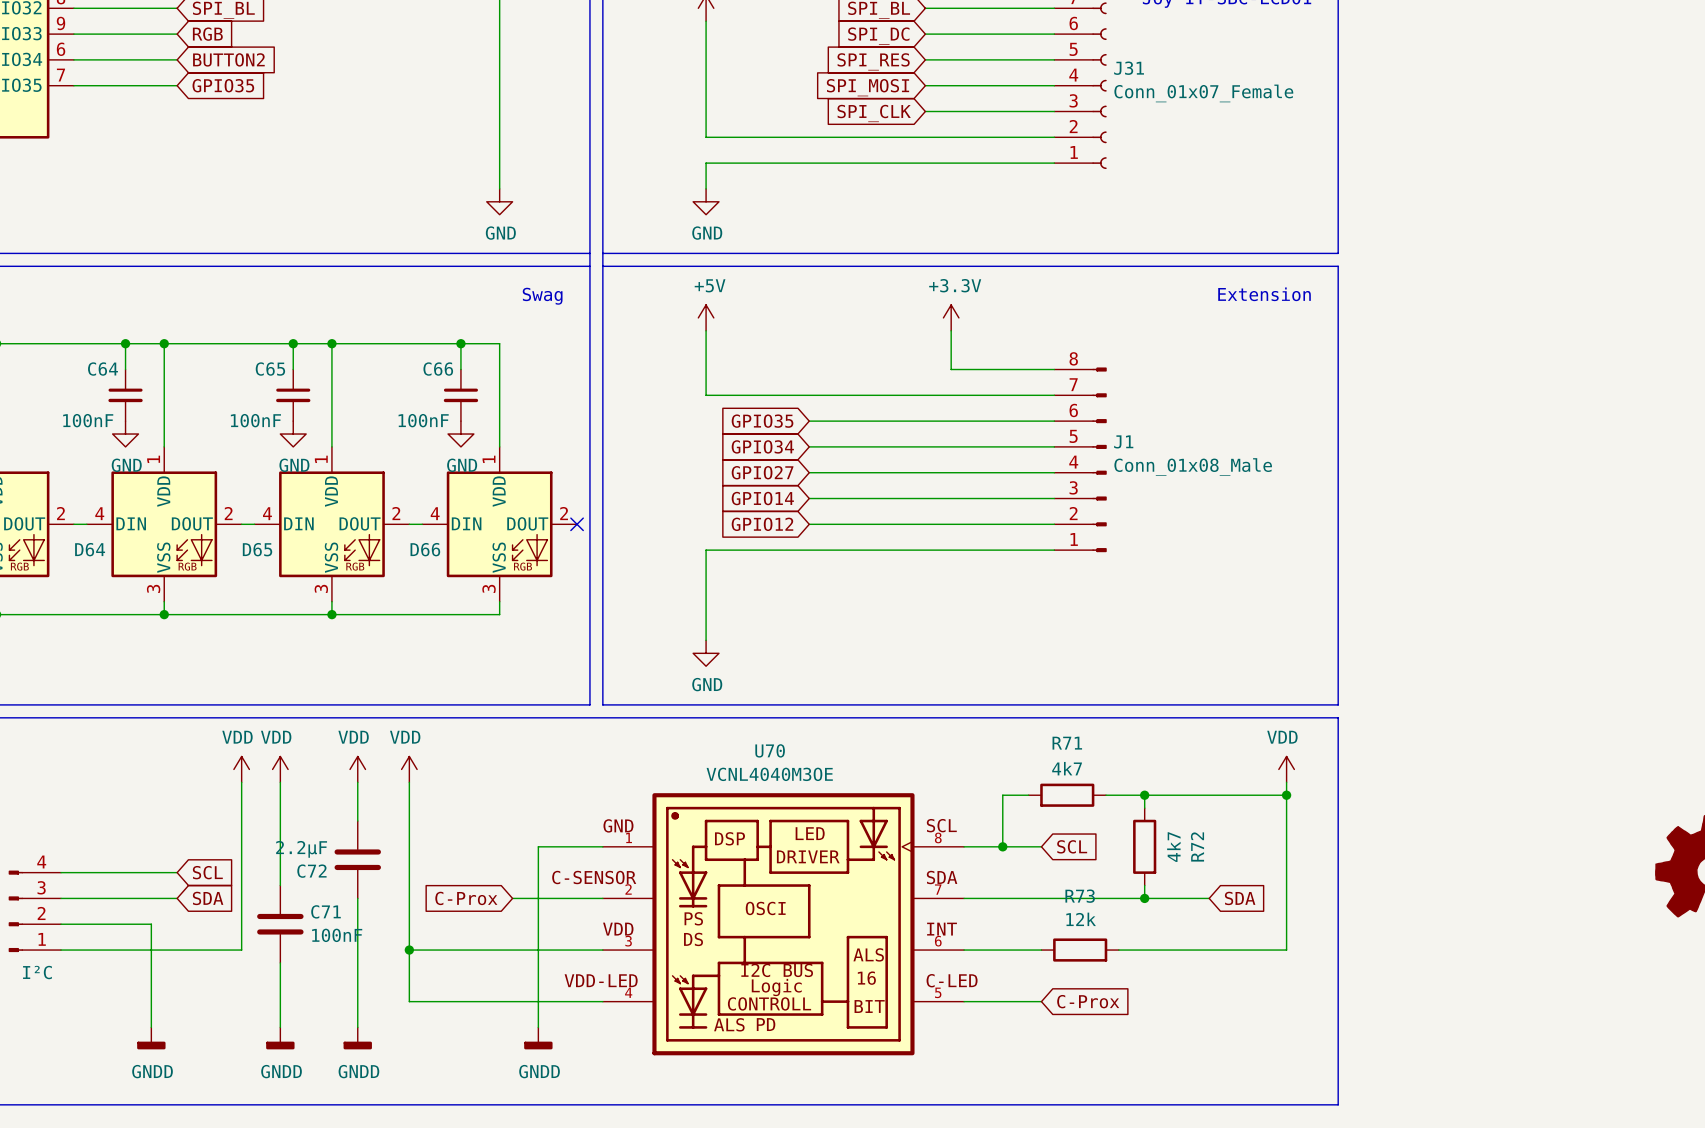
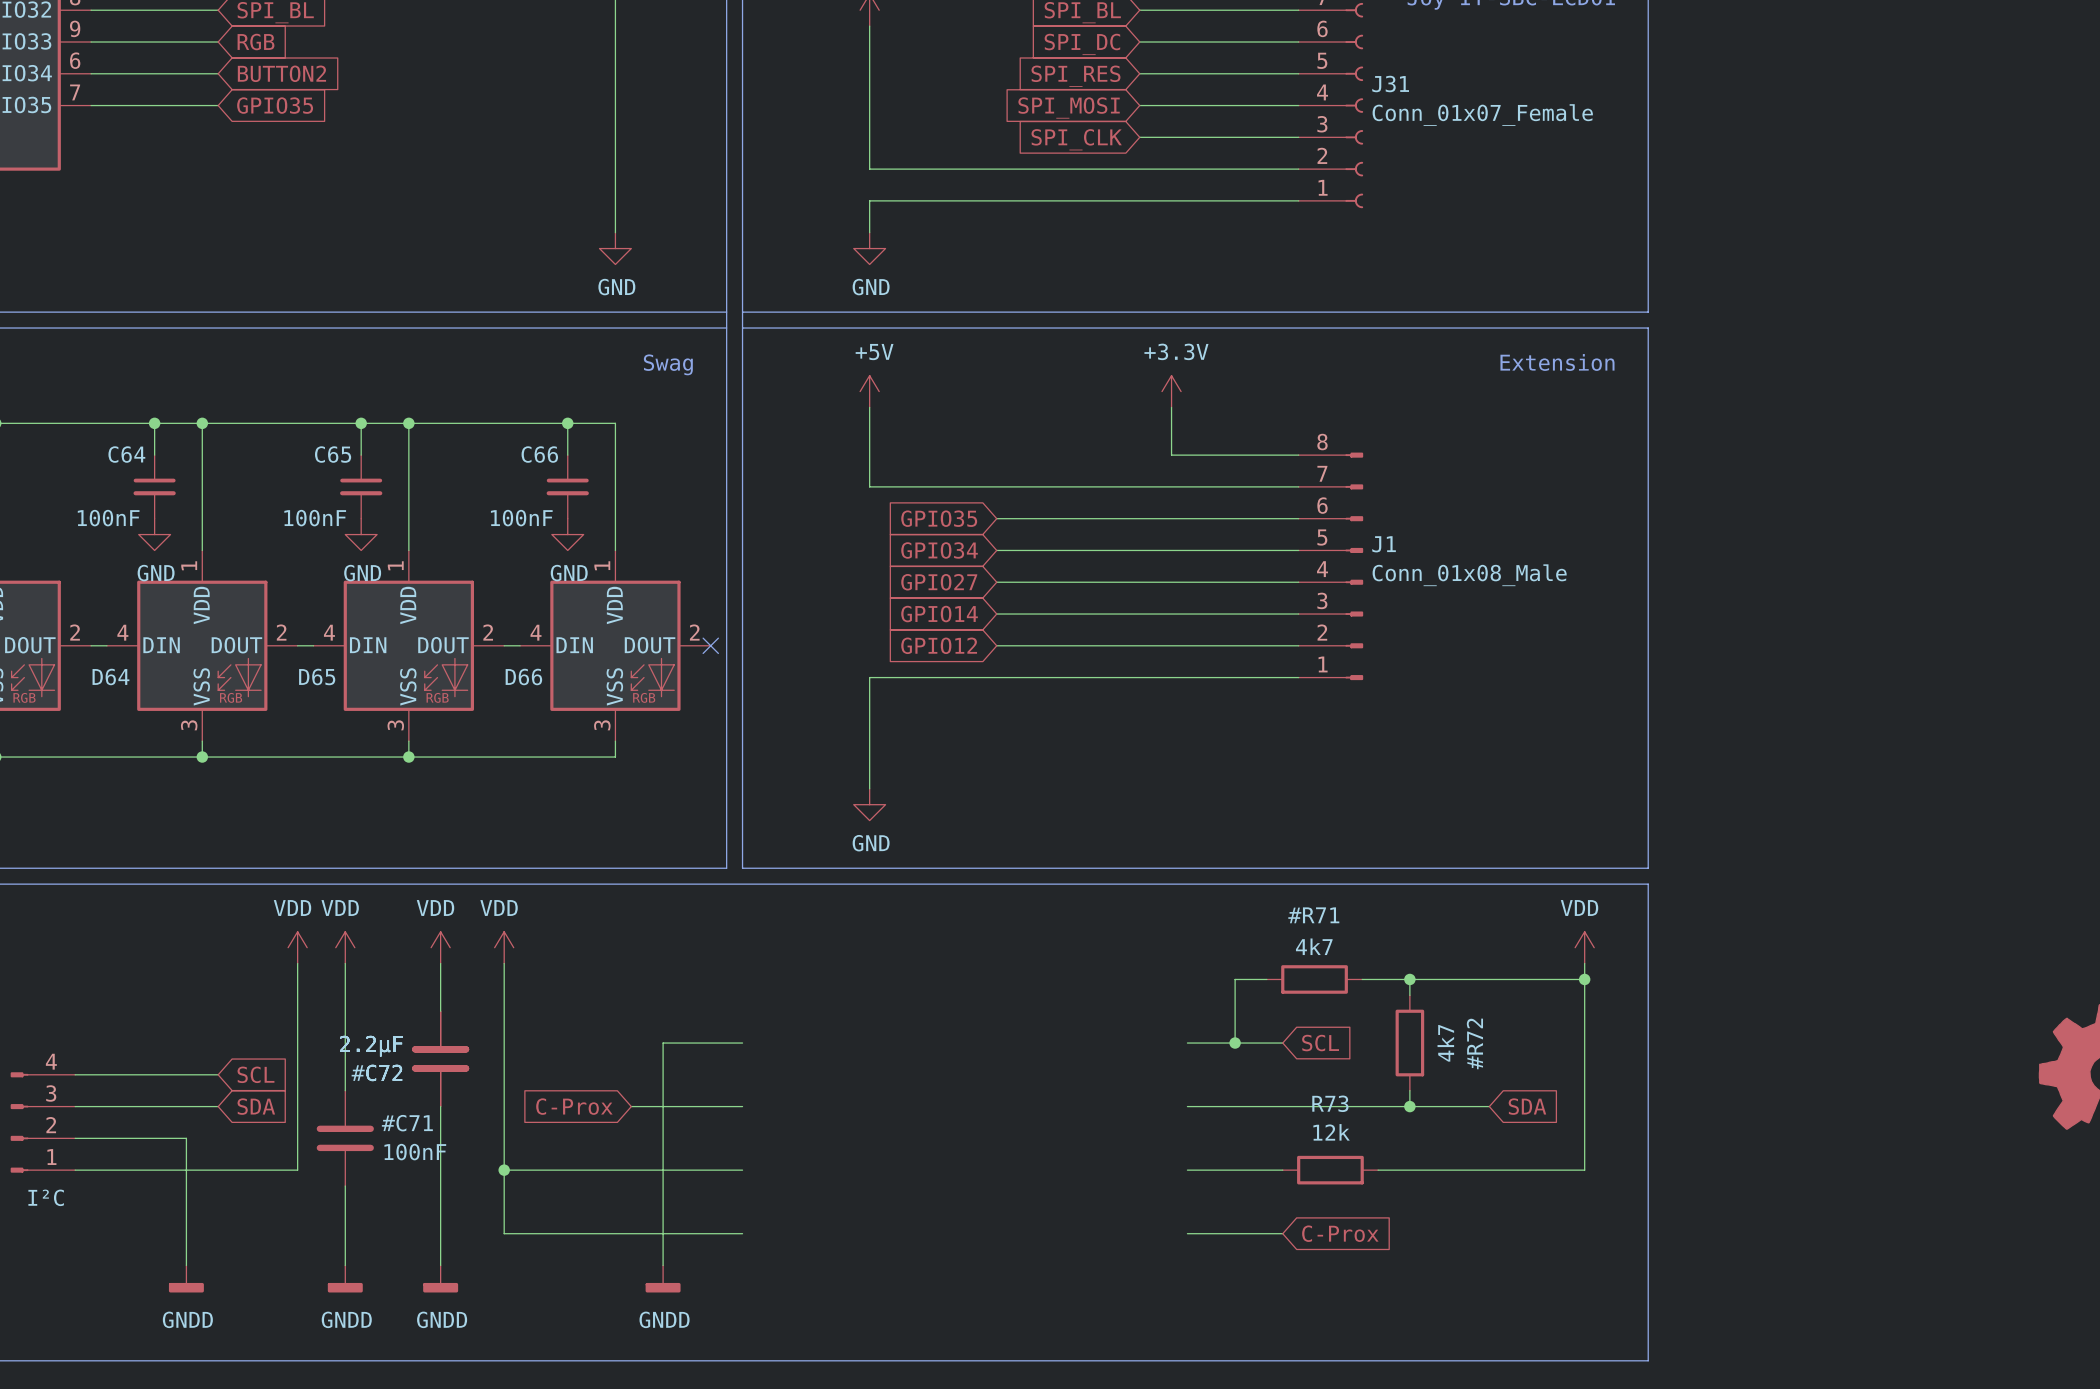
R71: 4k7 (1067, 795) -> none
#R71: none -> 4k7 (1314, 979)
R72: 4k7 (1144, 846) -> none
#R72: none -> 4k7 (1409, 1043)
power symbol: none -> 2.2µF (440, 1058)
C71: 100nF (280, 924) -> none
#C71: none -> 100nF (345, 1138)
U70: VCNL4040M3OE (783, 924) -> none

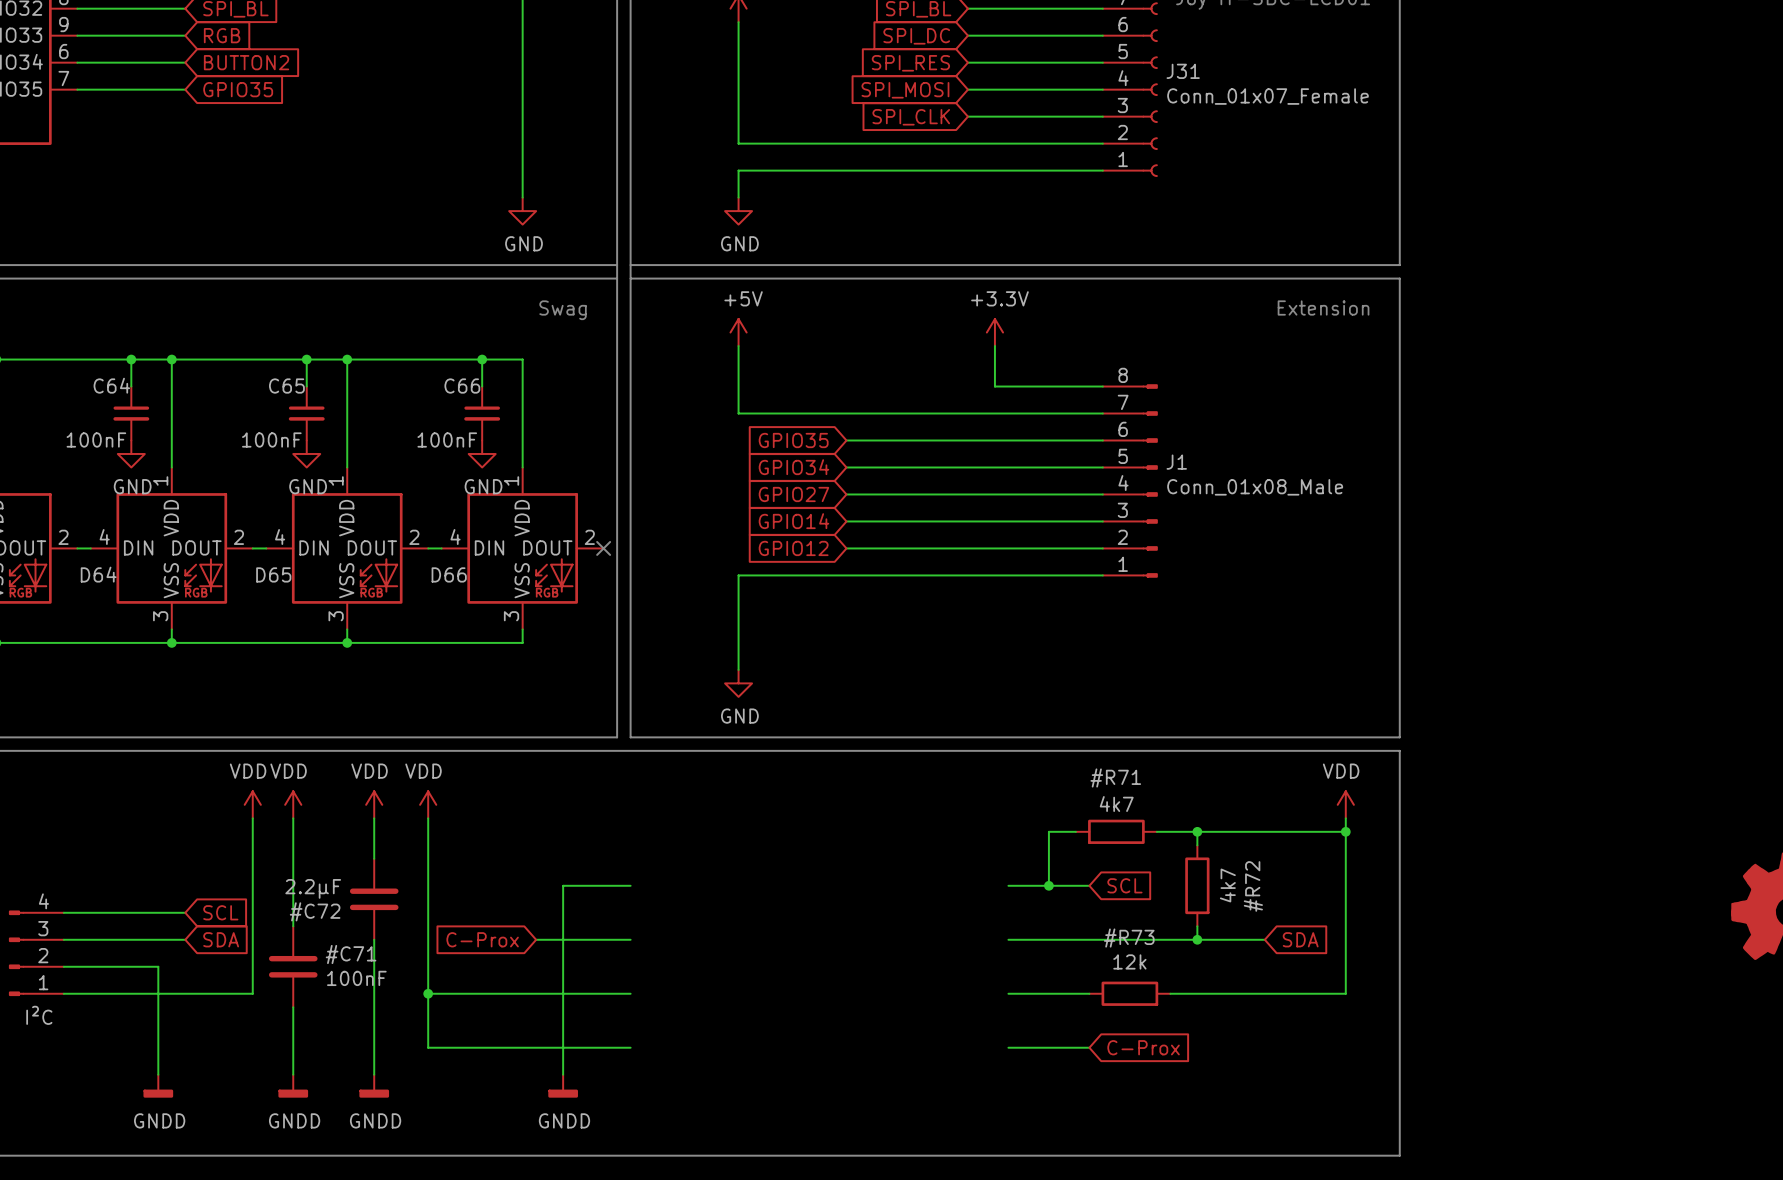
part: 2.2µF (440, 1058) -> none
R73: 12k (1330, 1170) -> none
#R73: none -> 12k (1129, 993)

